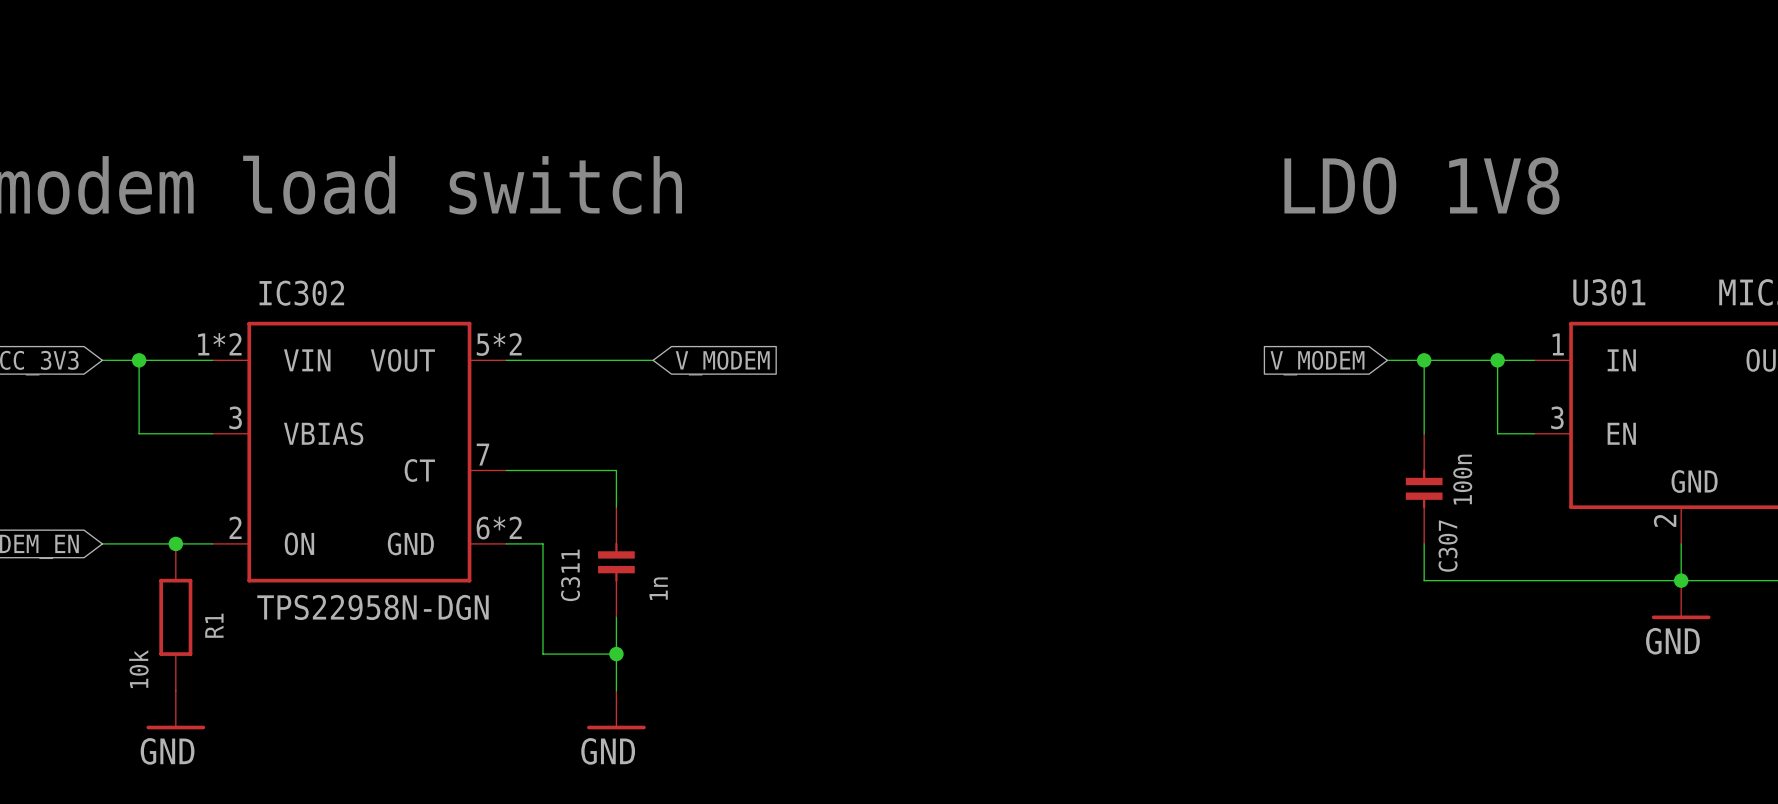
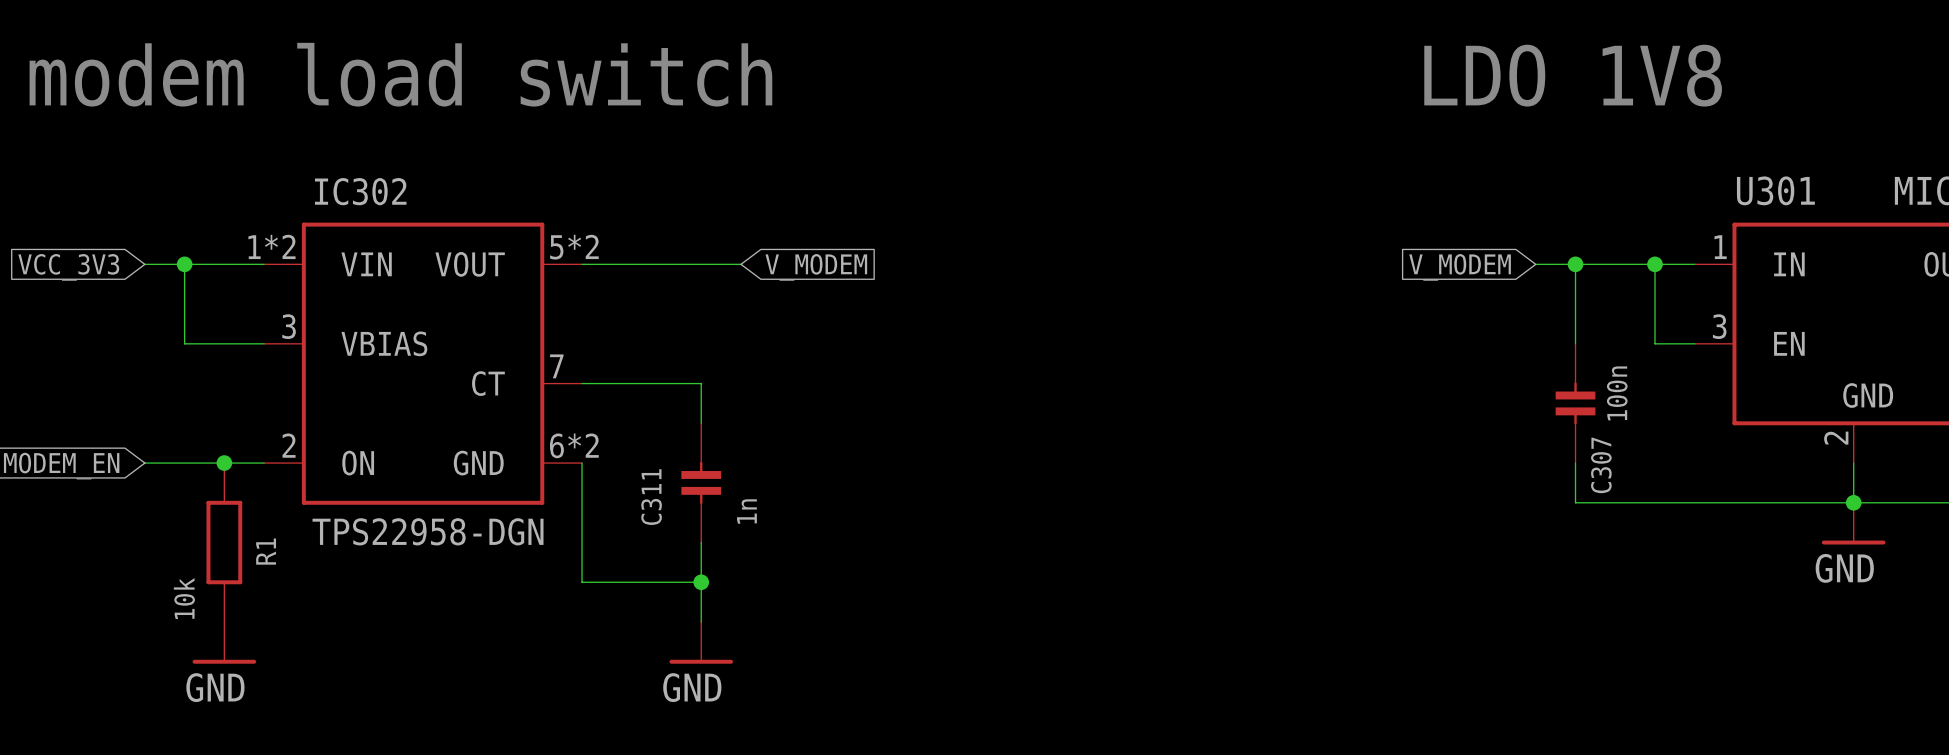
wire: (506, 543) (542, 543) (542, 654) -> (582, 463) (582, 582) (621, 582)
IC302 value: TPS22958N-DGN (372, 607) -> TPS22958-DGN (428, 531)

